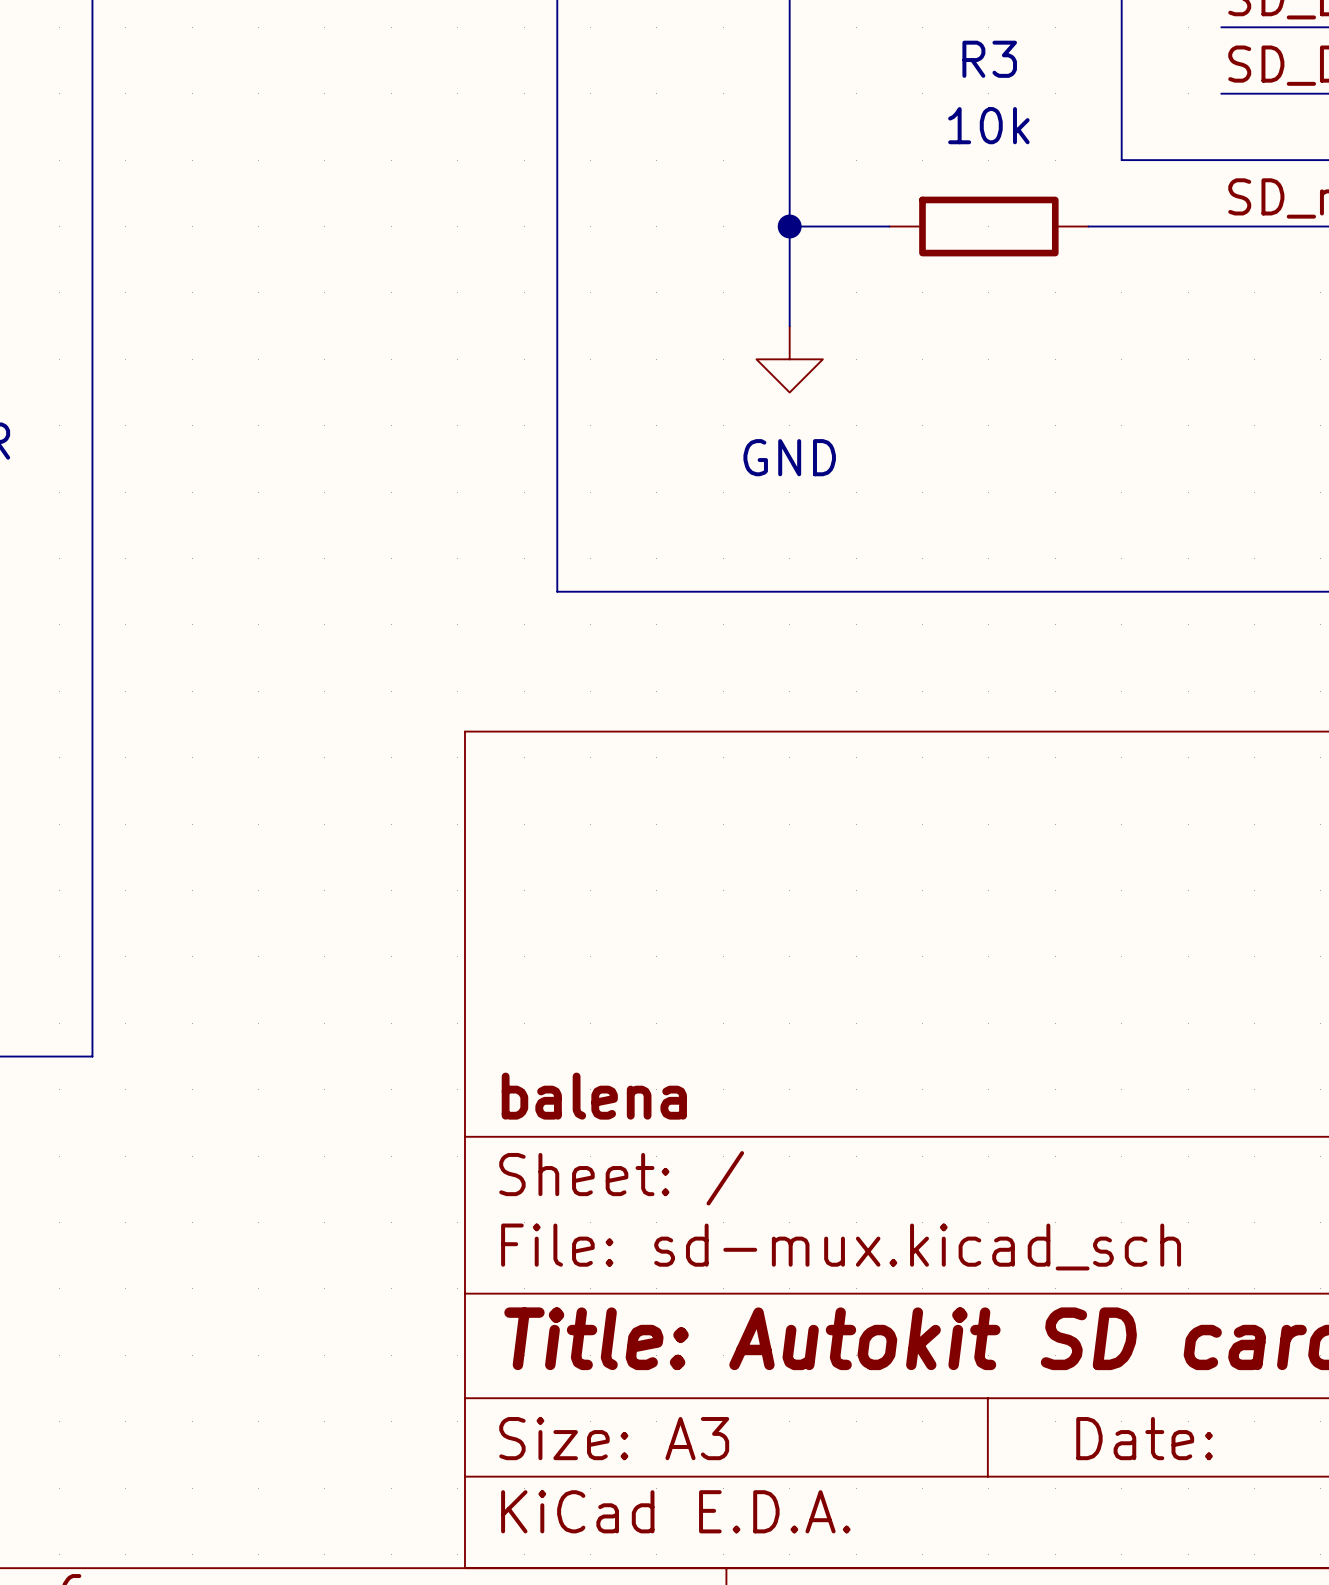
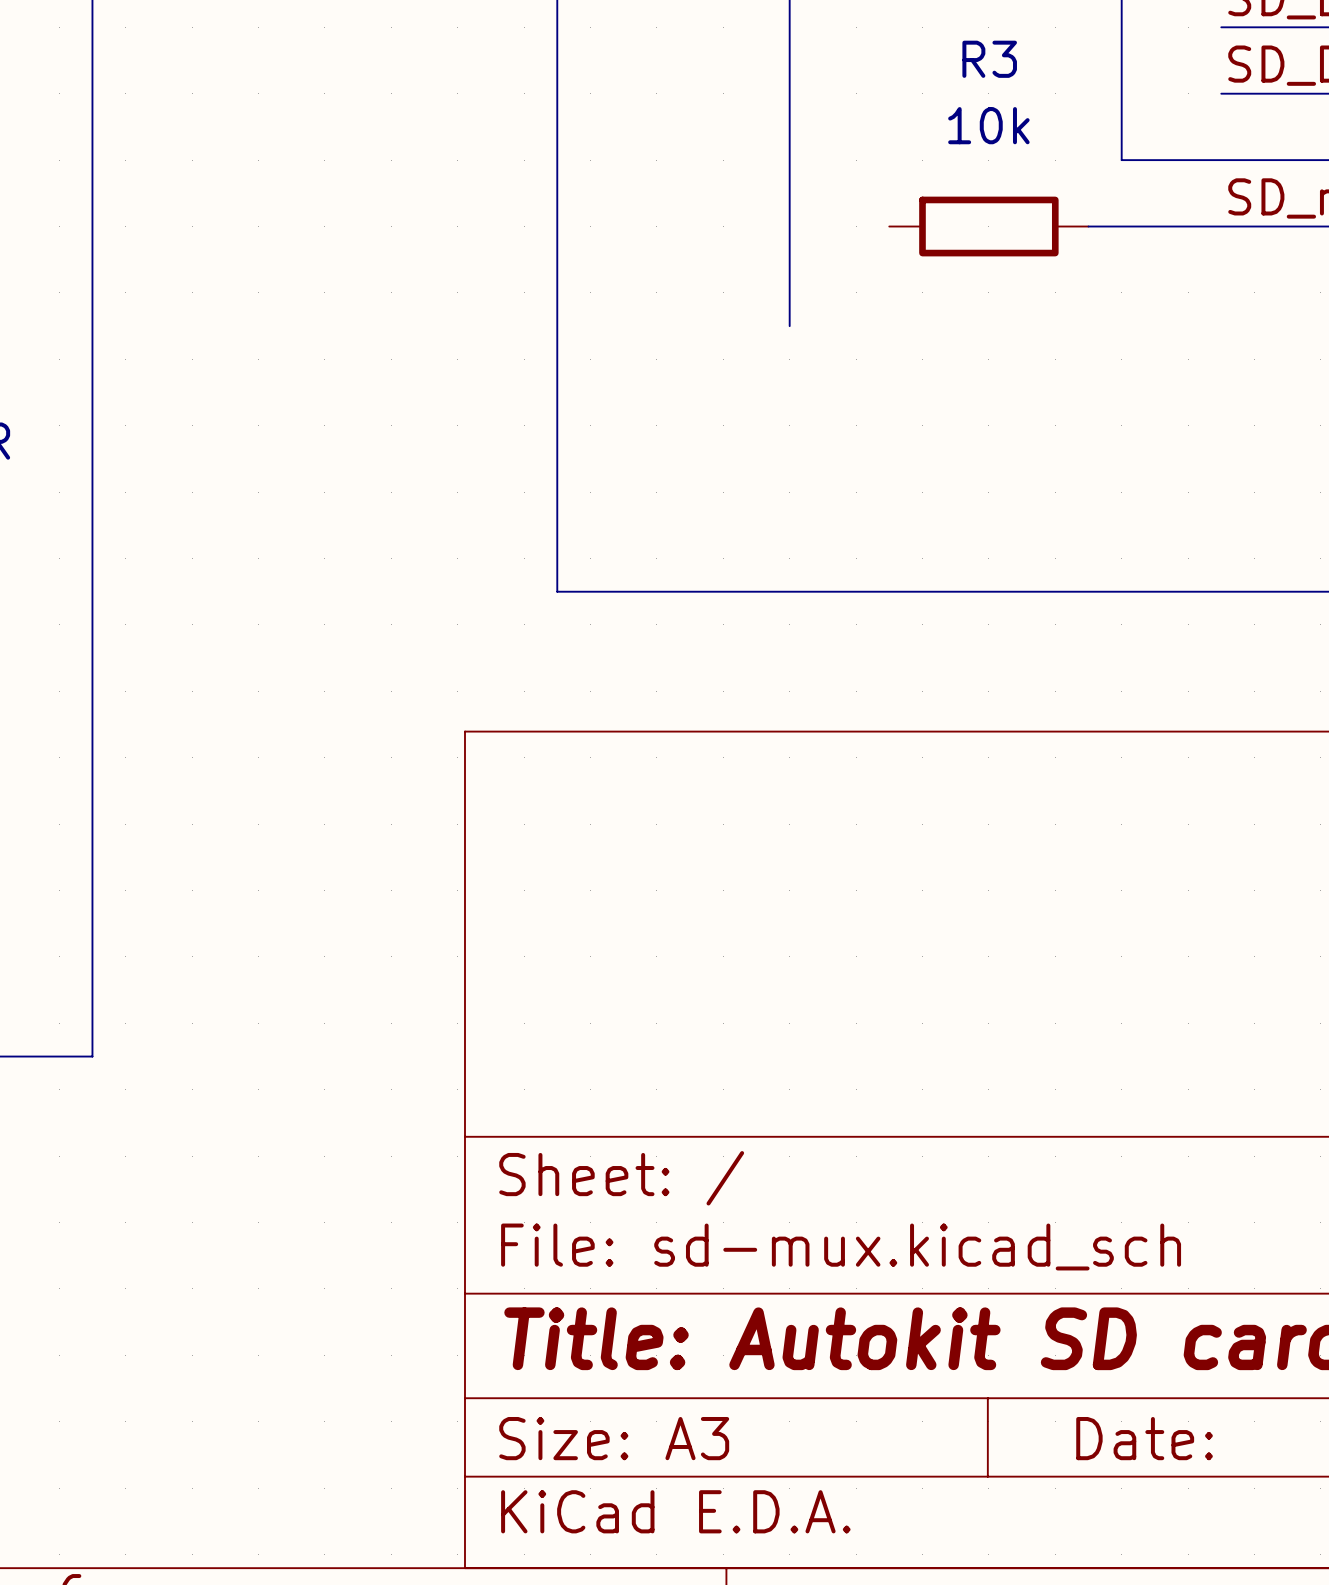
wire: (789, 226) (889, 226) -> none
junction: (789, 226) -> none
power symbol: GND (789, 359) -> none
title block: balena (594, 1096) -> none

